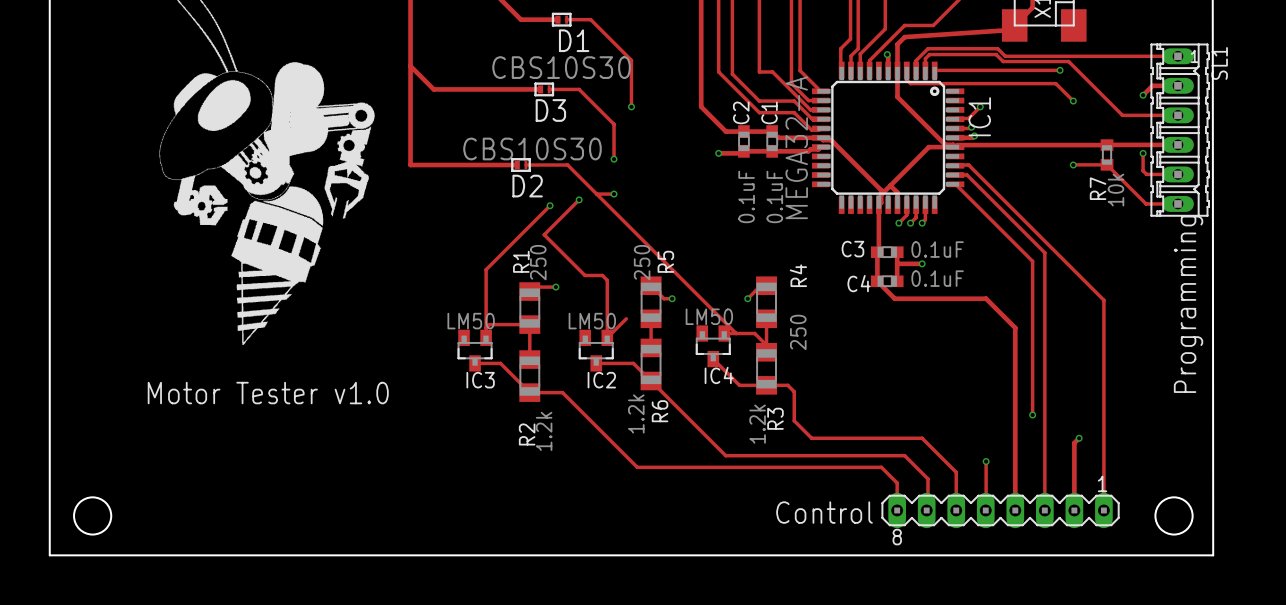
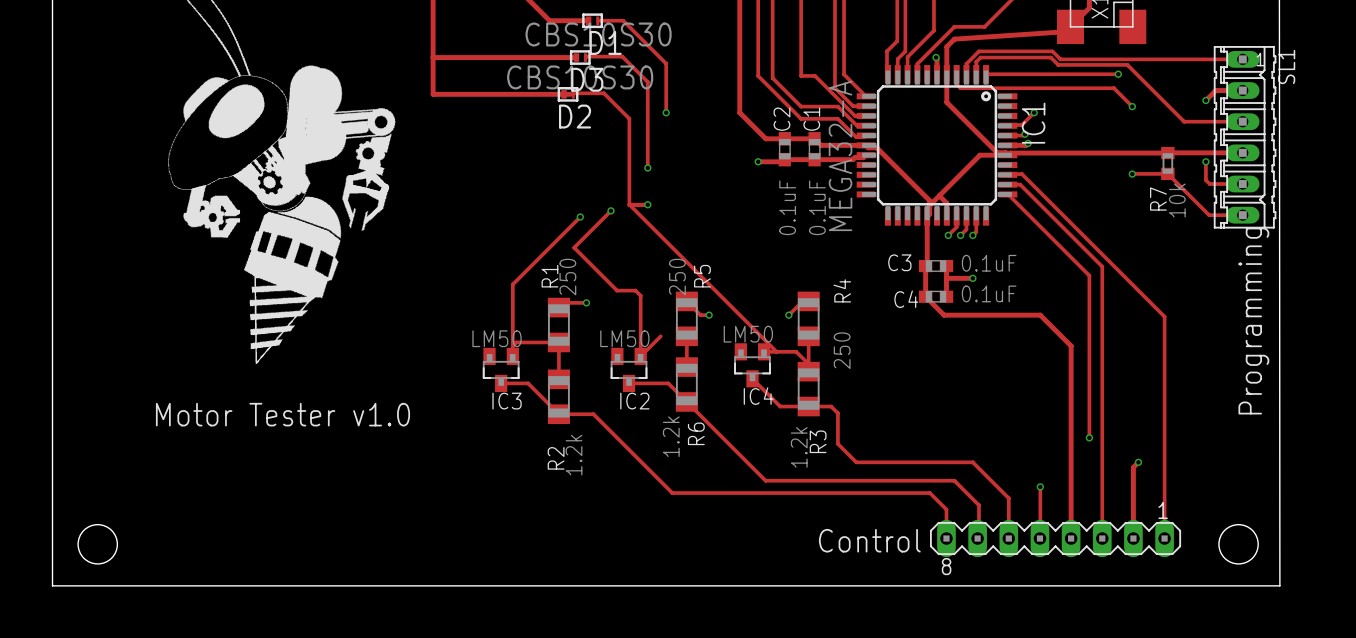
track: none -> (433, 57) (576, 57)
track: (410, 66) (433, 89) -> (433, 94) (457, 94)
track: (410, 89) (410, 165) (517, 165) -> none
D3 position: (544, 89) -> (580, 57)
track: (549, 89) (579, 89) (614, 124) -> (585, 57) (622, 56) (647, 82) (647, 131)
D2 position: (521, 165) -> (568, 94)
track: (525, 165) (567, 165) (596, 194) -> (573, 94) (603, 93) (629, 118) (629, 204)

